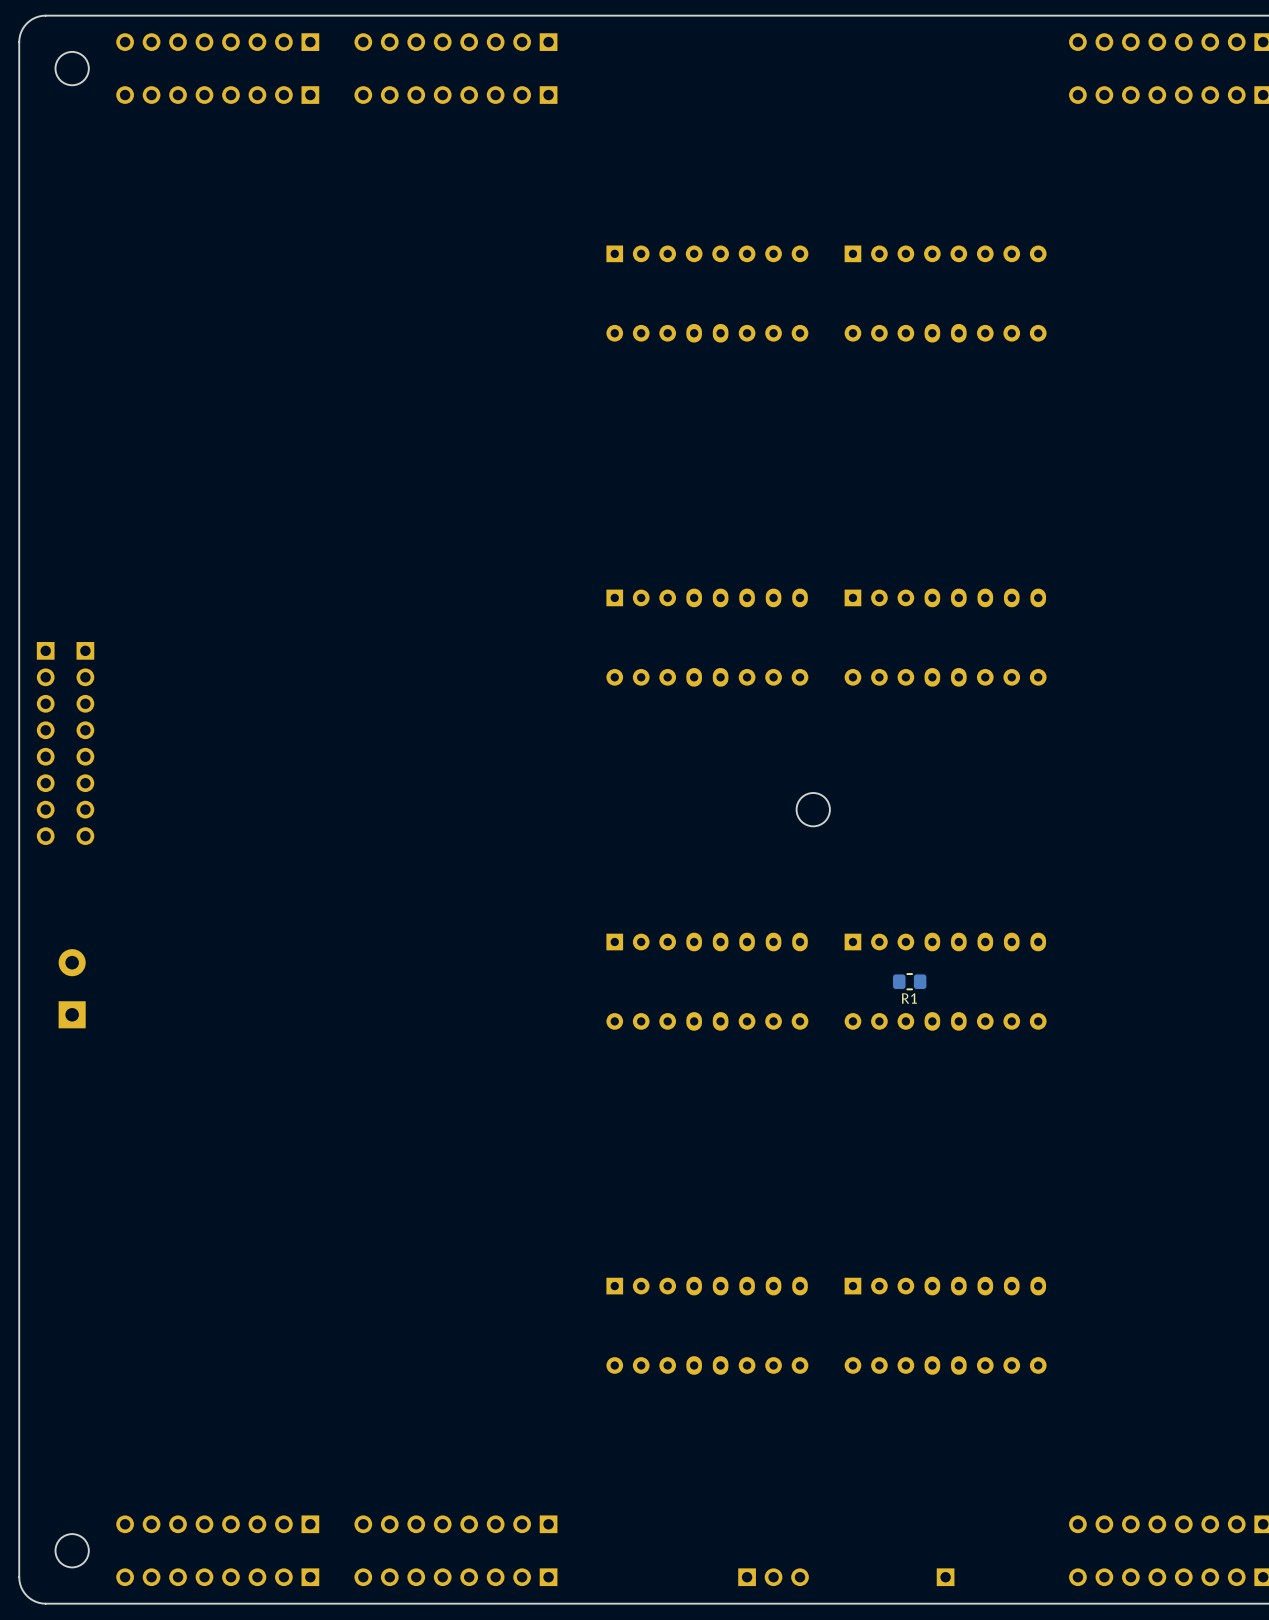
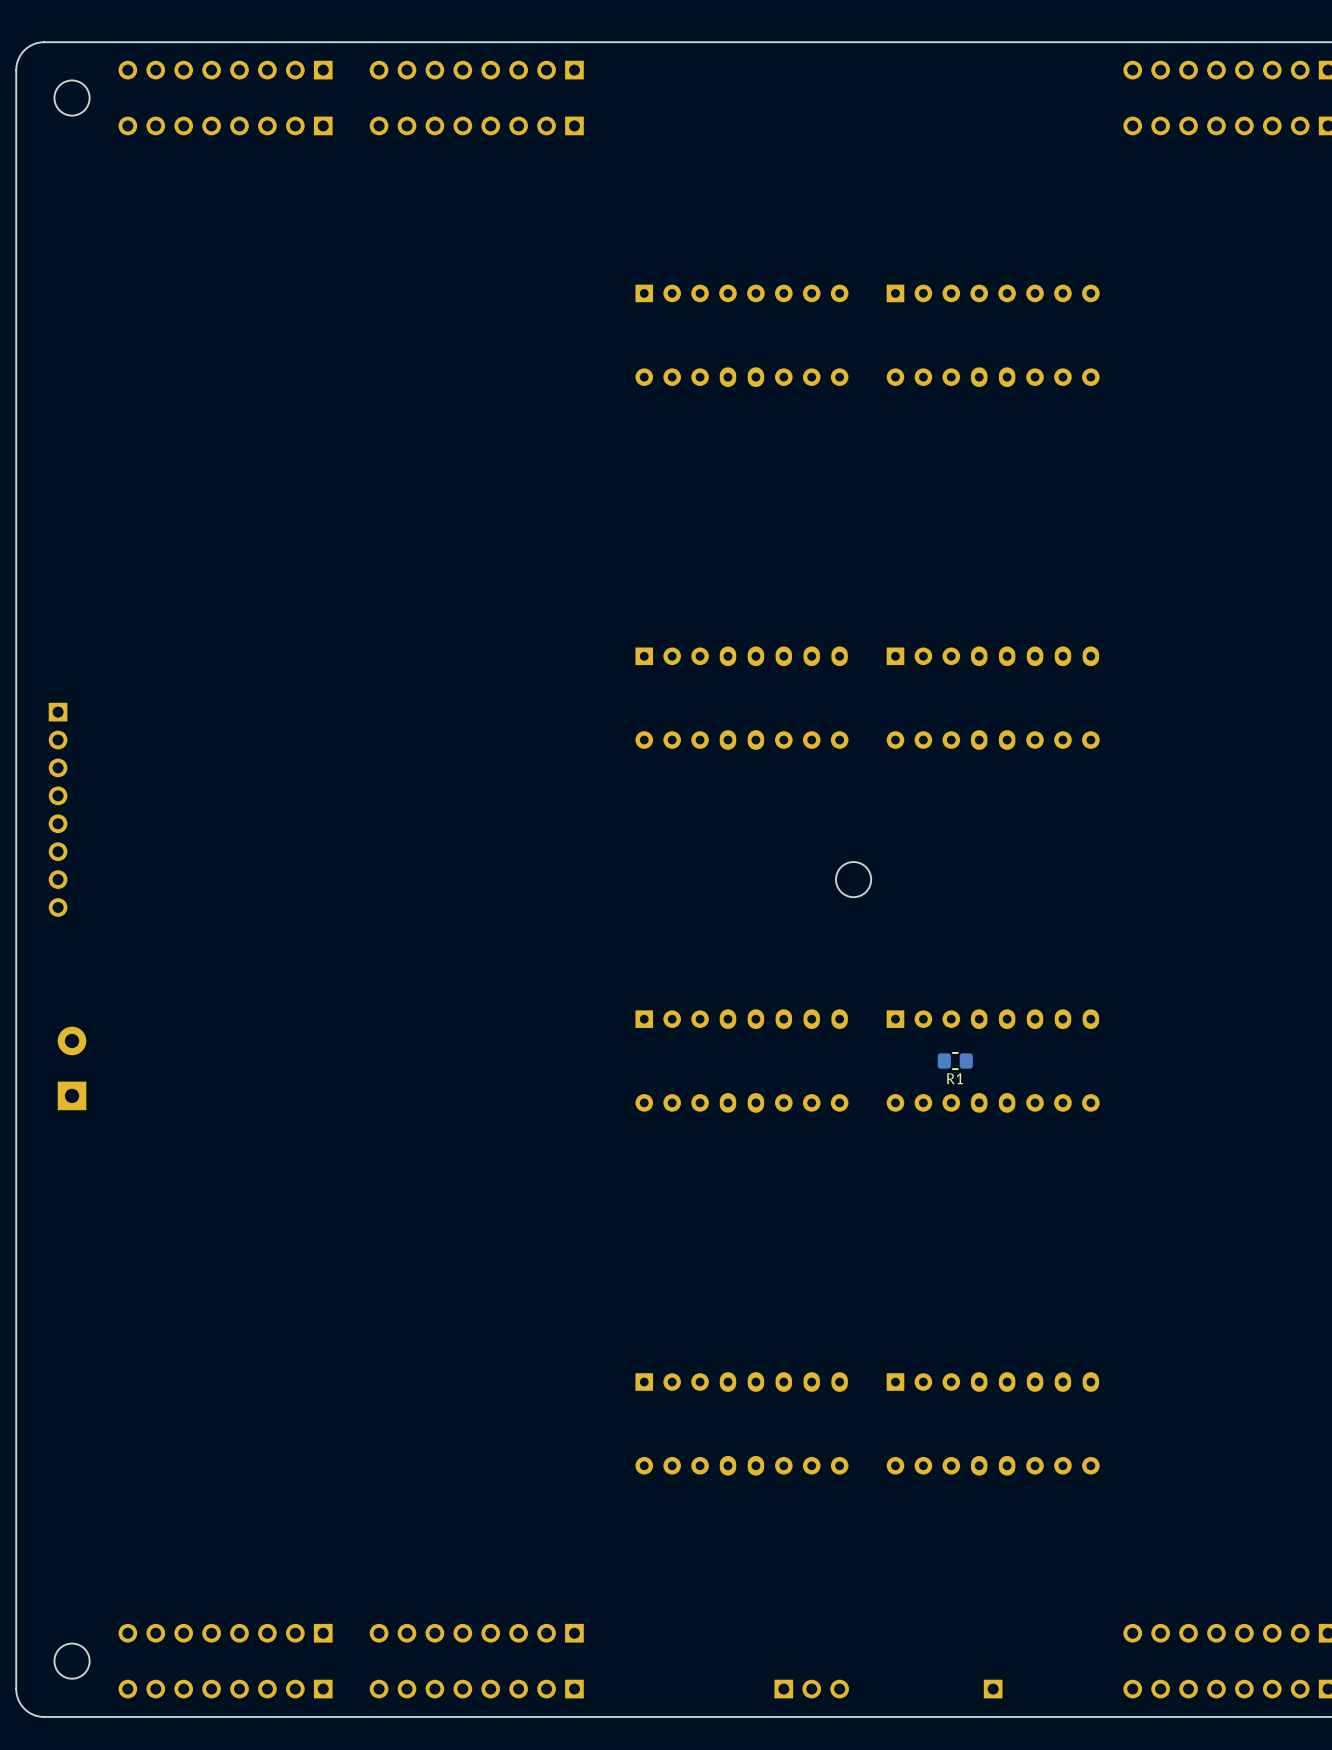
part: (45, 743) -> none
part: none -> (58, 809)
part: (85, 743) -> none

